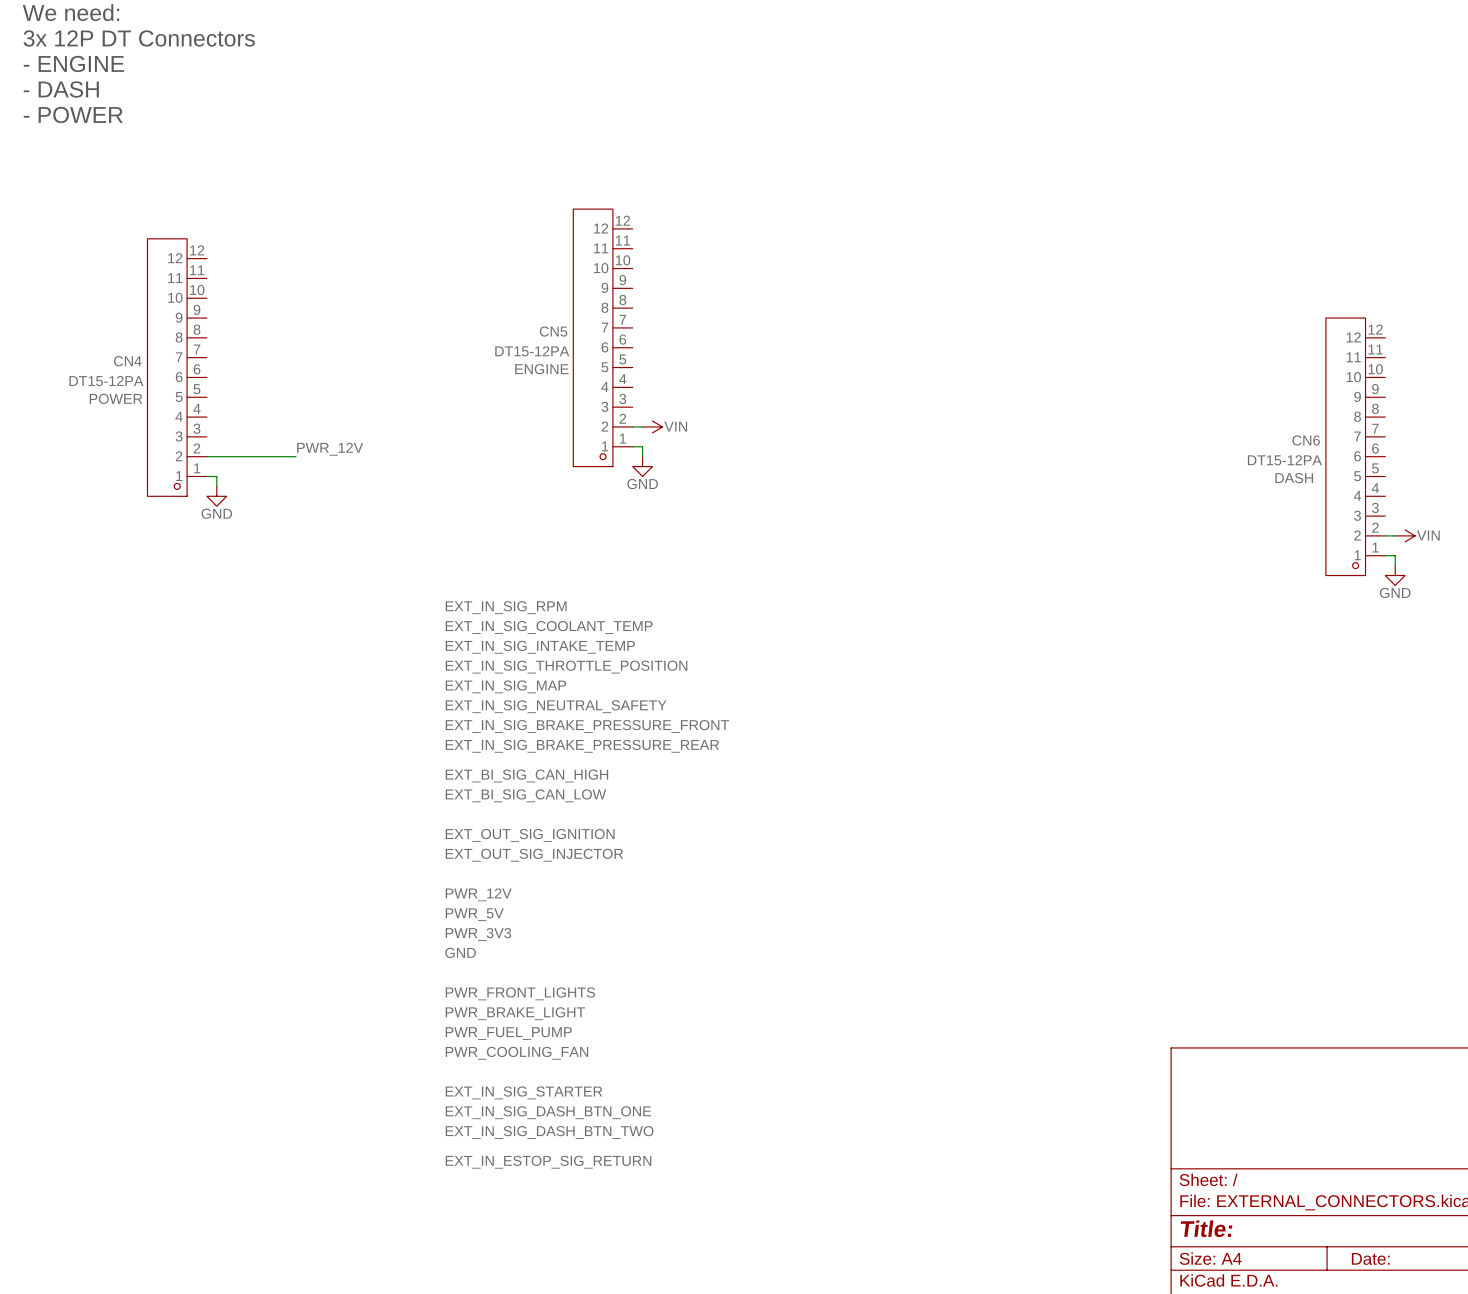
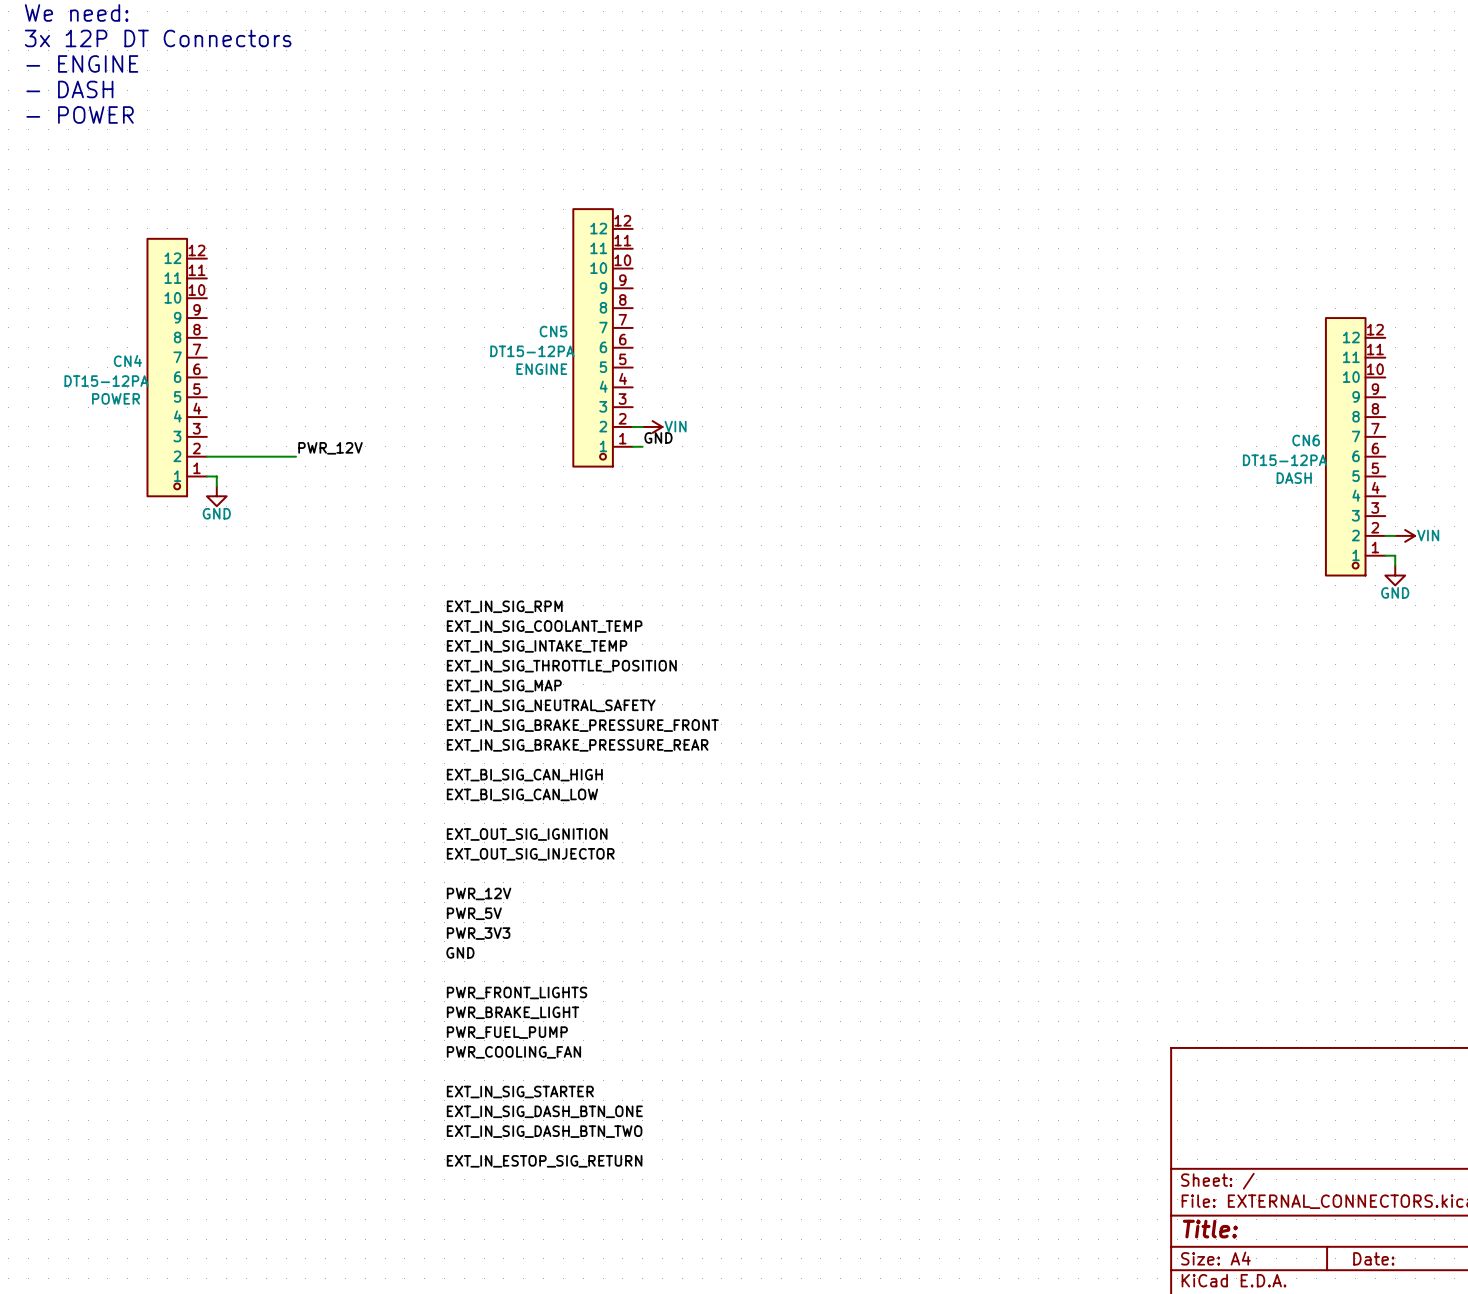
label: none -> GND (658, 437)
wire: (642, 446) (642, 456) -> none
power symbol: GND (642, 466) -> none

